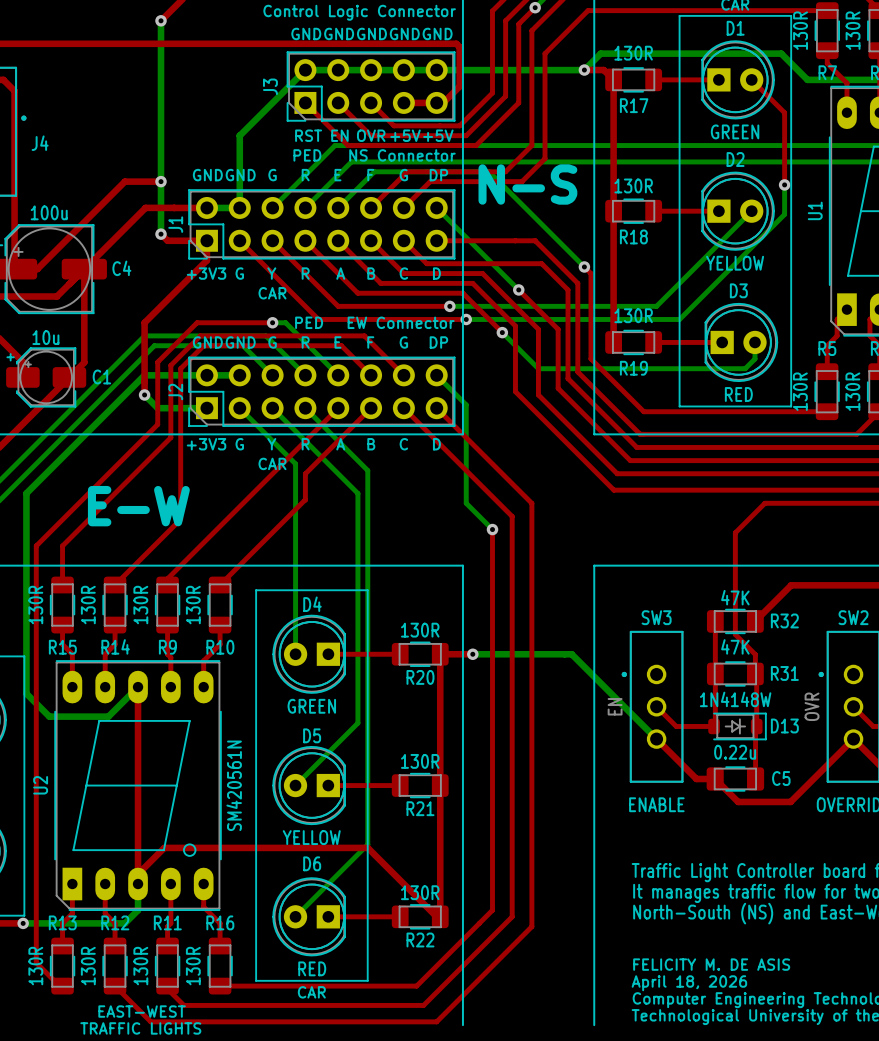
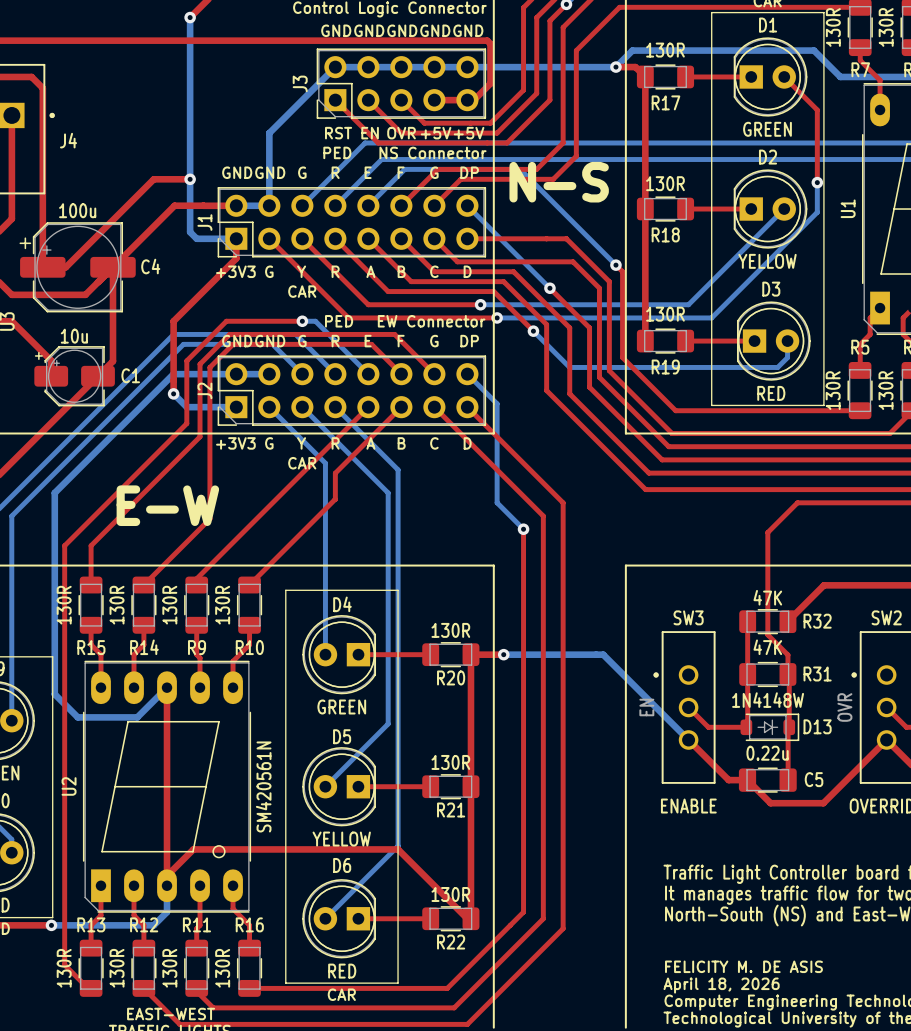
top track: (161, 234) (167, 240) (206, 240) -> none
bottom track: none -> (190, 232) (196, 238) (236, 238)
via: (161, 234) -> none

